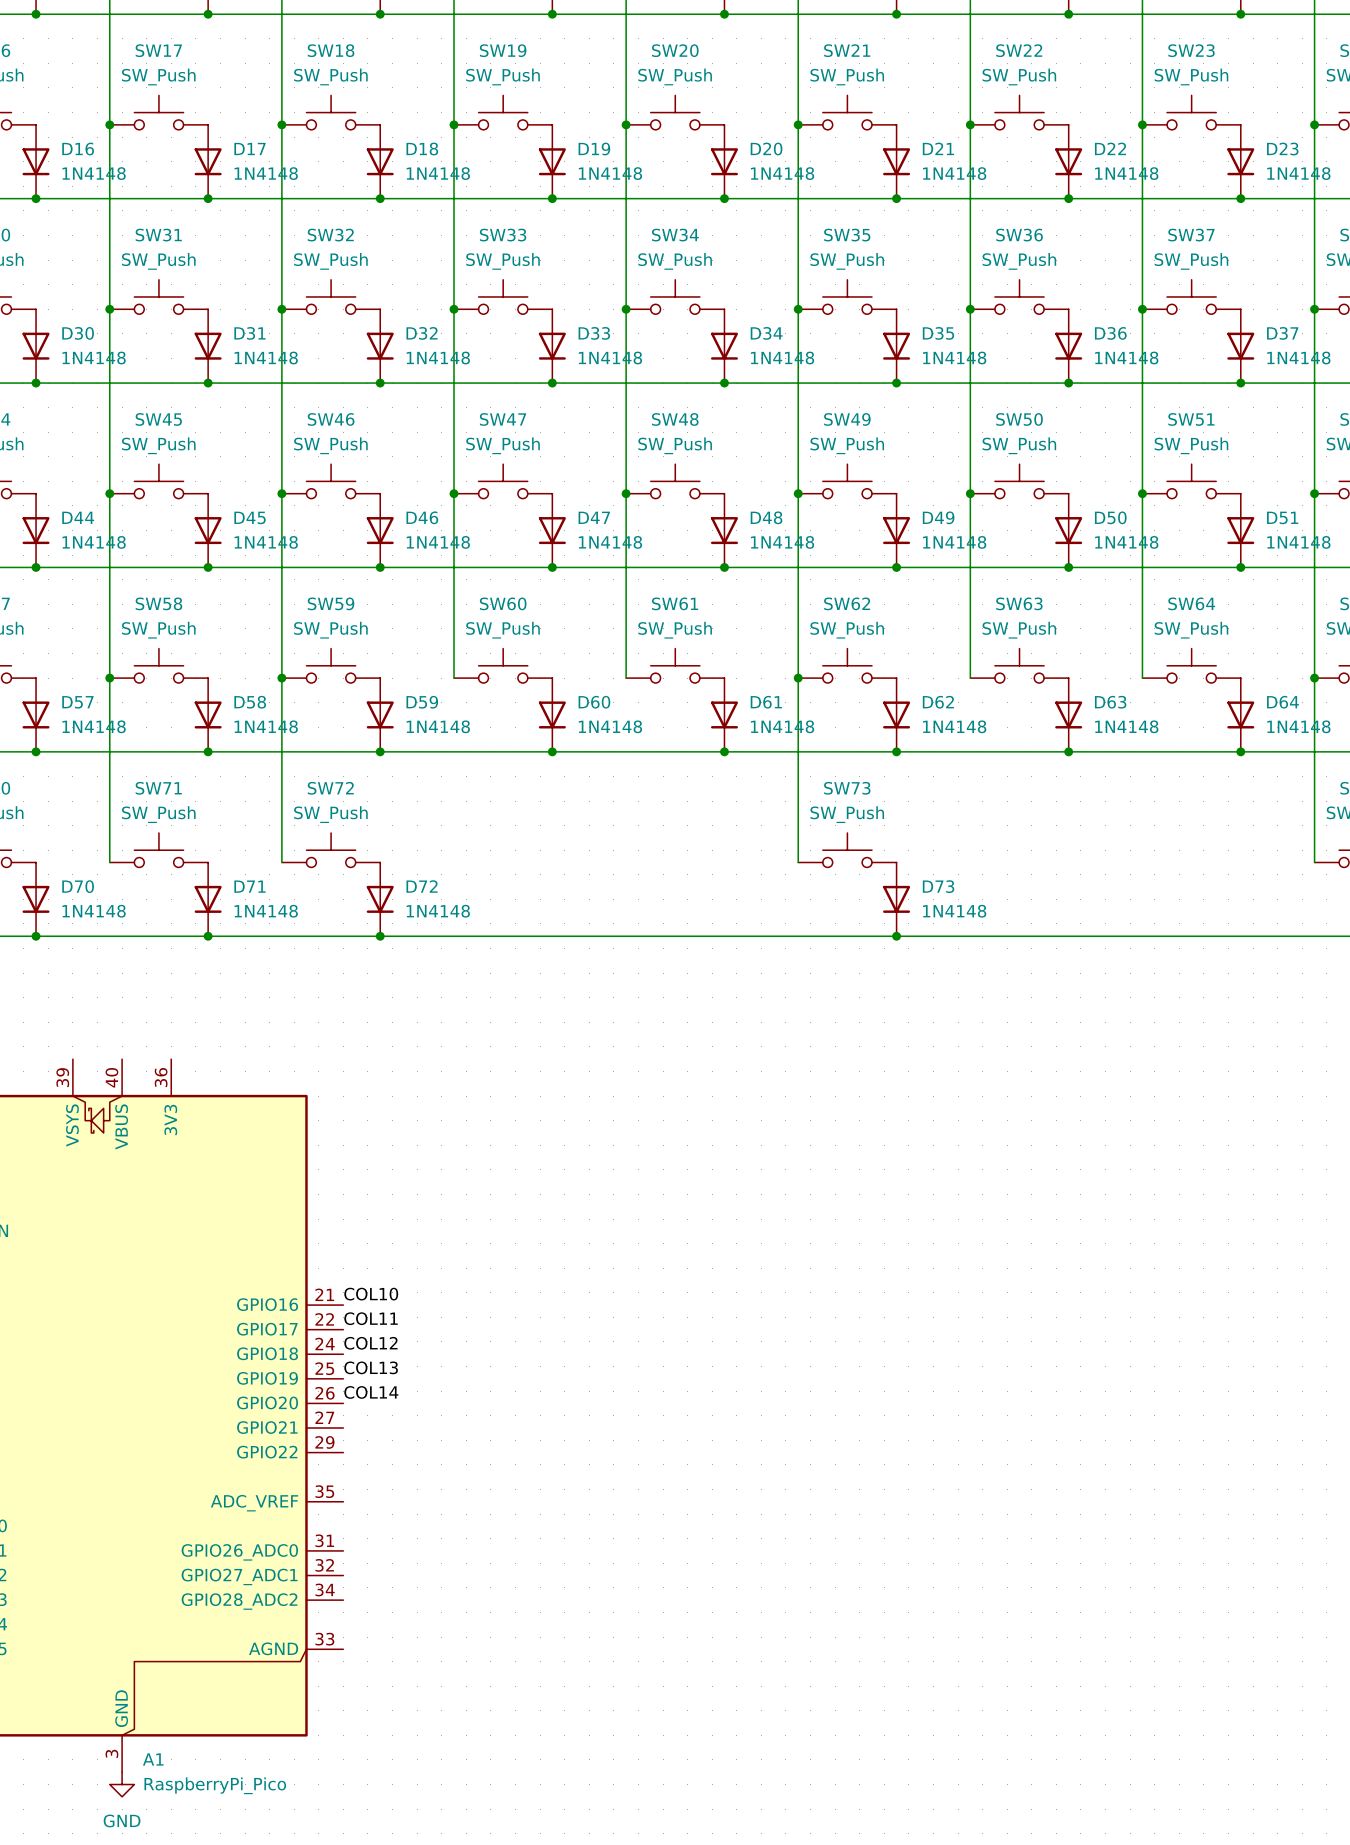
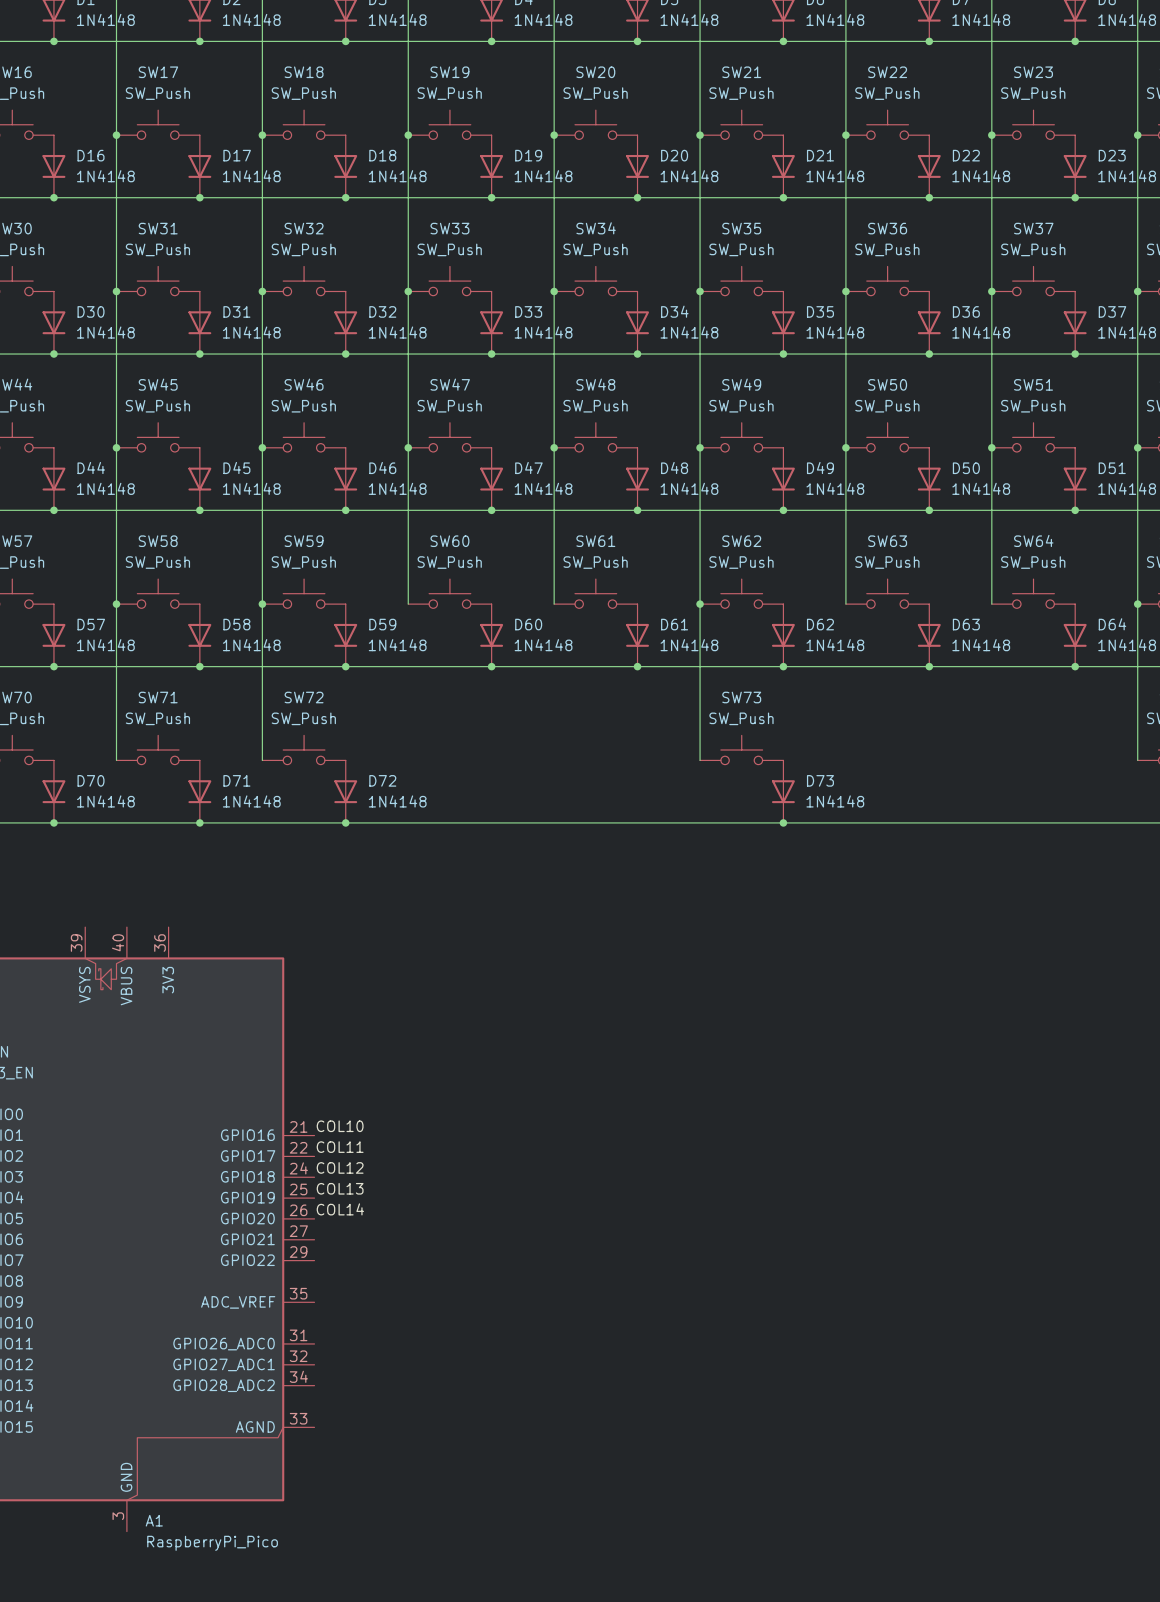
power symbol: GND (122, 1784) -> none

